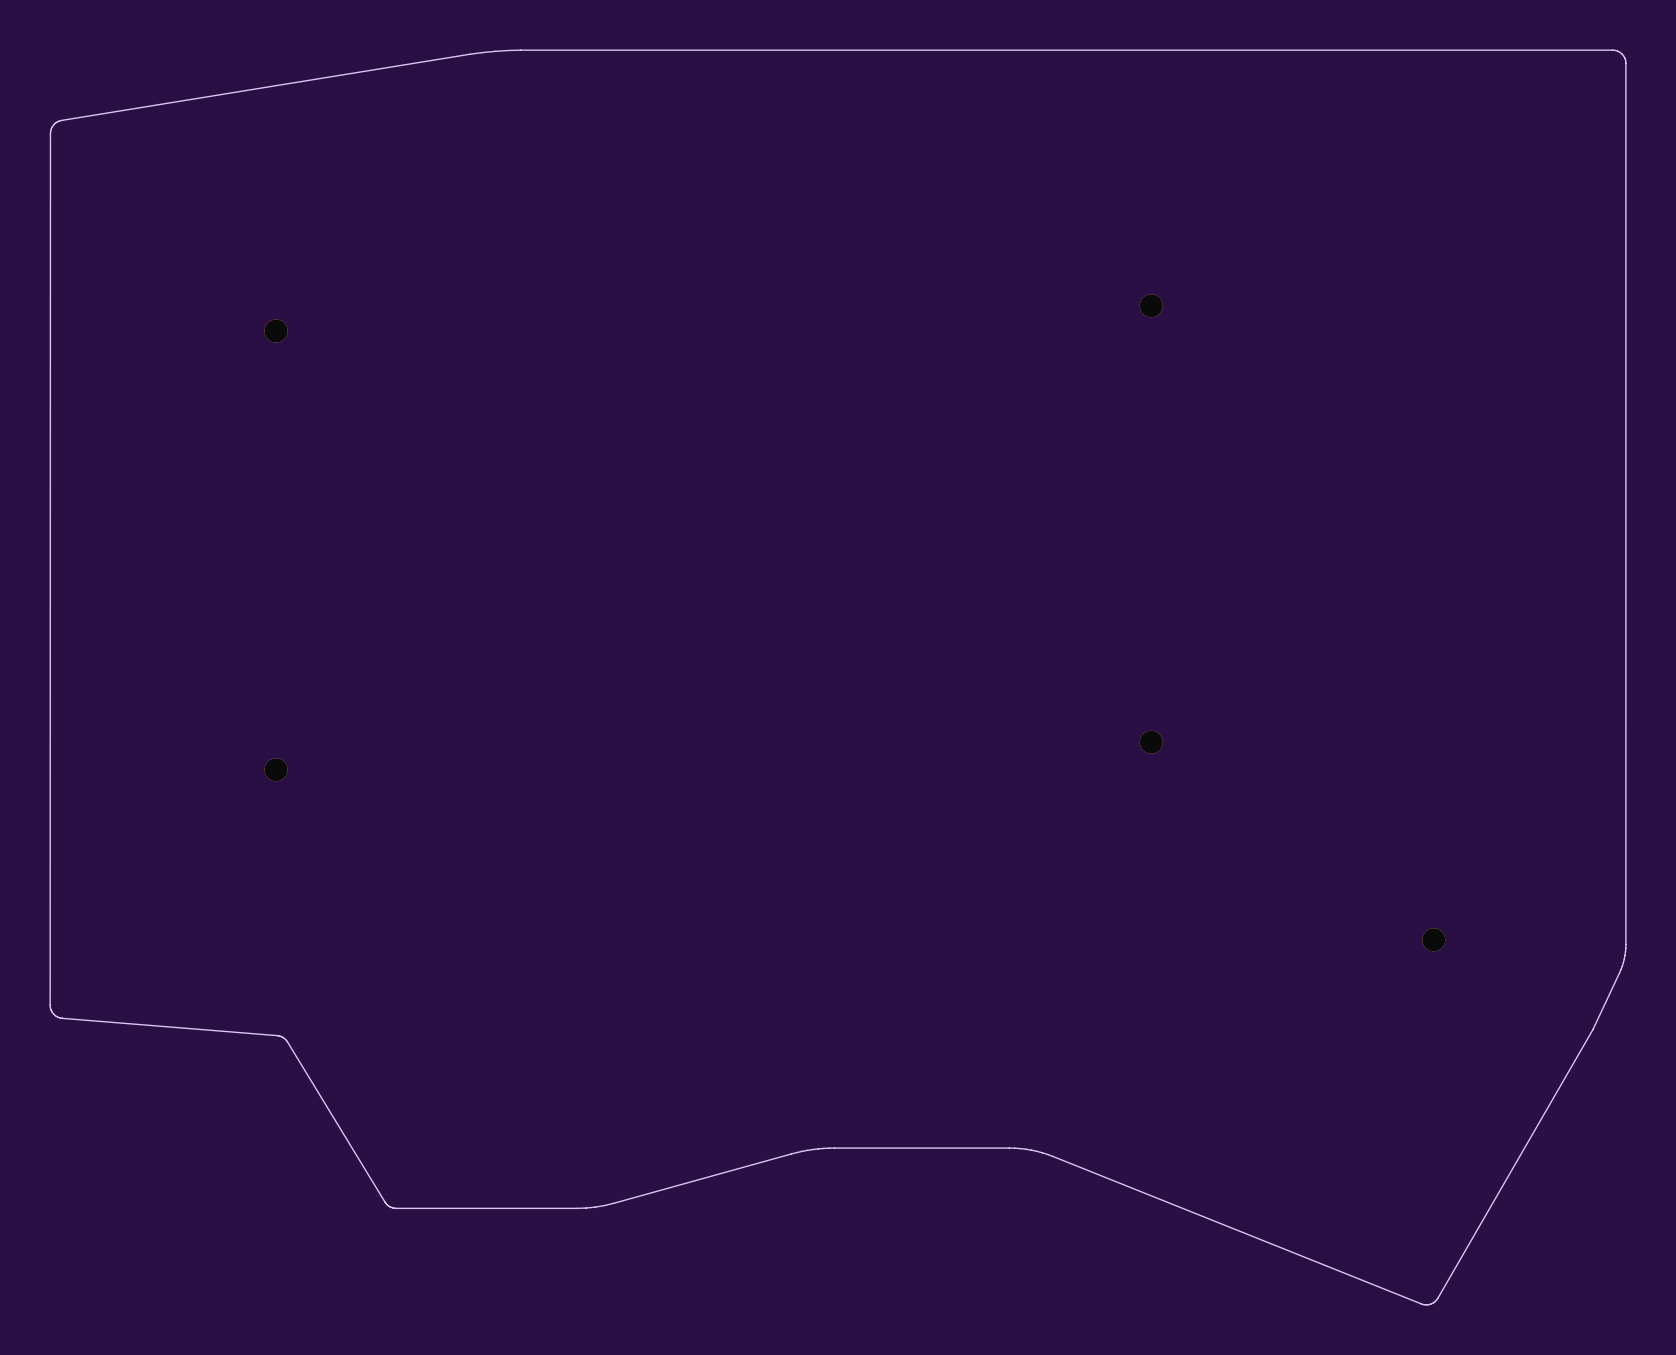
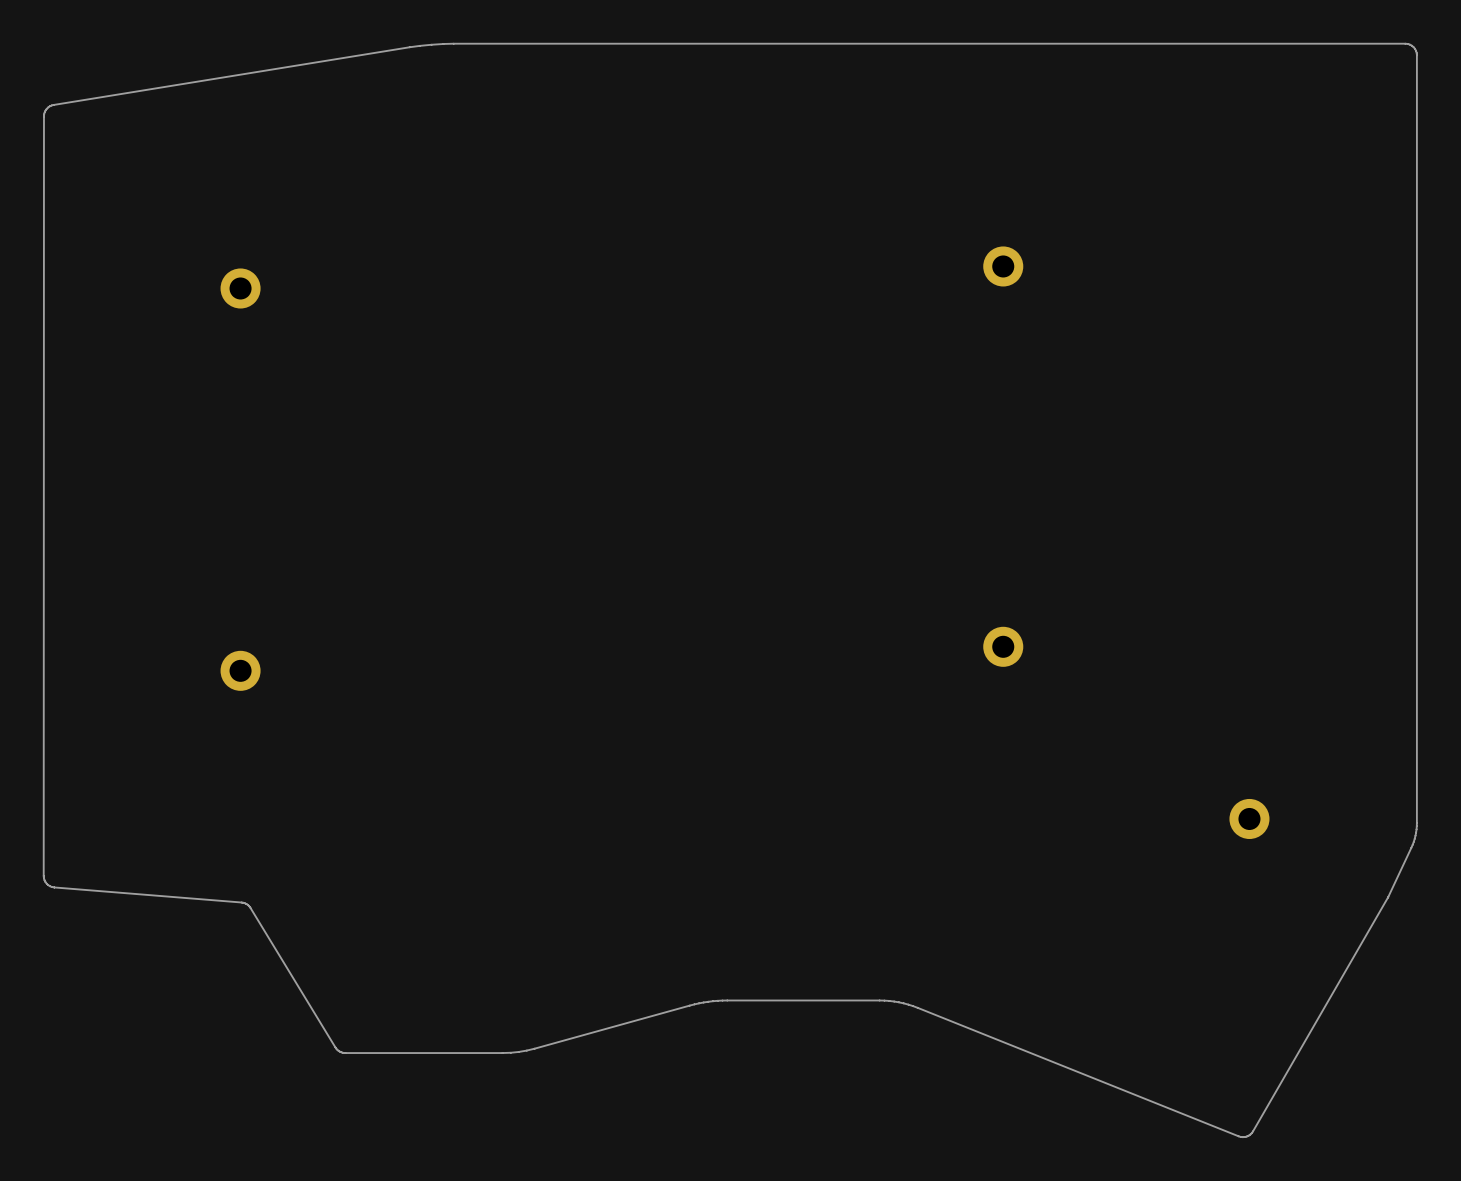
part footprint: [1139, 294, 1163, 318] -> [983, 246, 1024, 287]
part footprint: [264, 319, 288, 343] -> [220, 268, 261, 309]
part footprint: [1139, 730, 1163, 754] -> [983, 626, 1024, 667]
part footprint: [264, 758, 288, 782] -> [220, 650, 261, 691]
part footprint: [1422, 928, 1446, 952] -> [1229, 798, 1270, 840]

